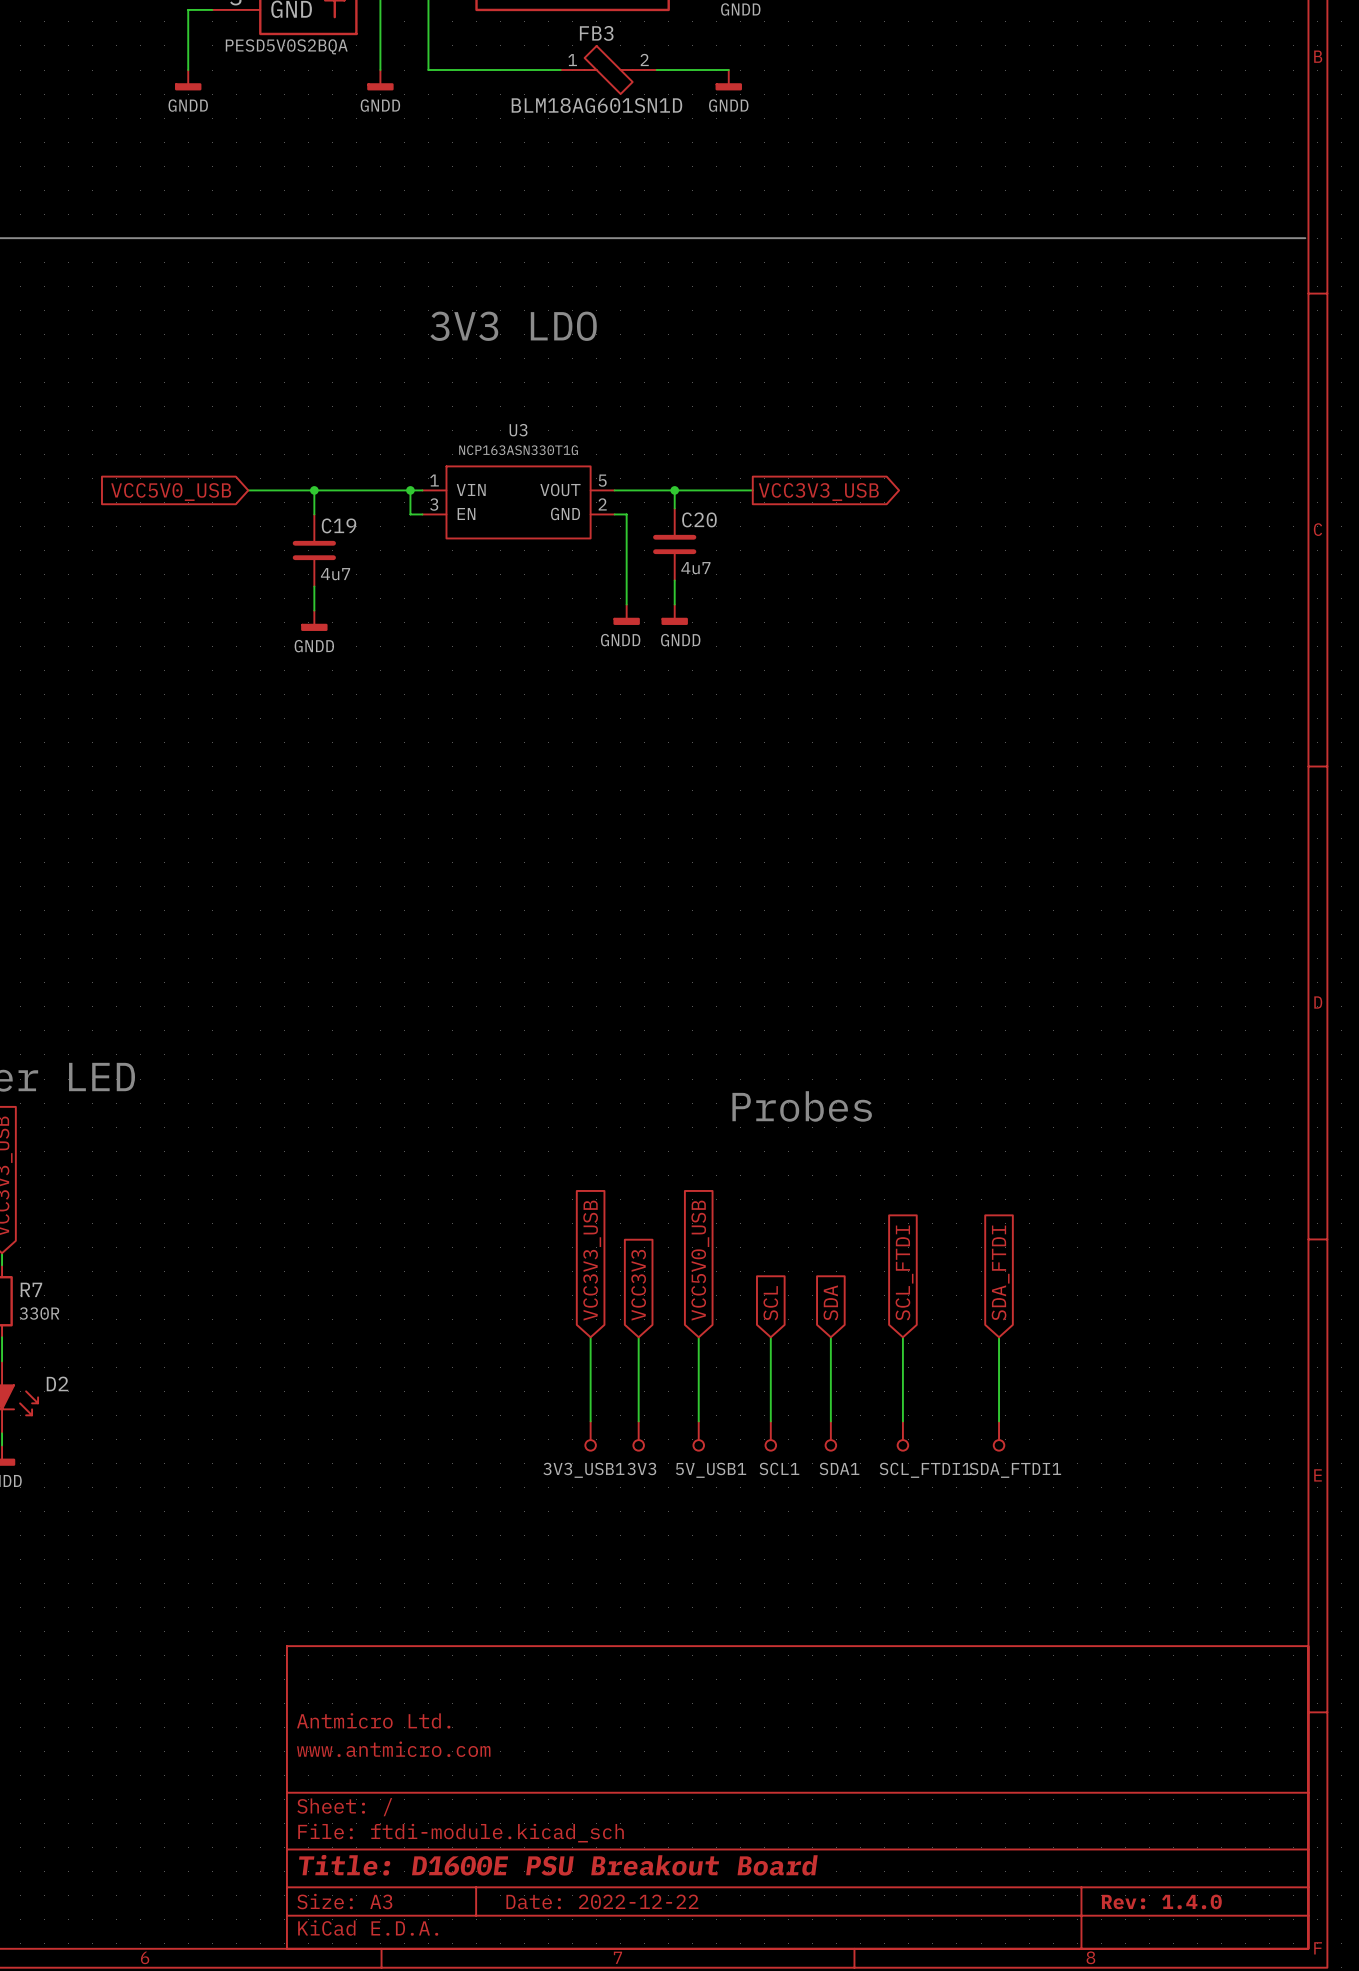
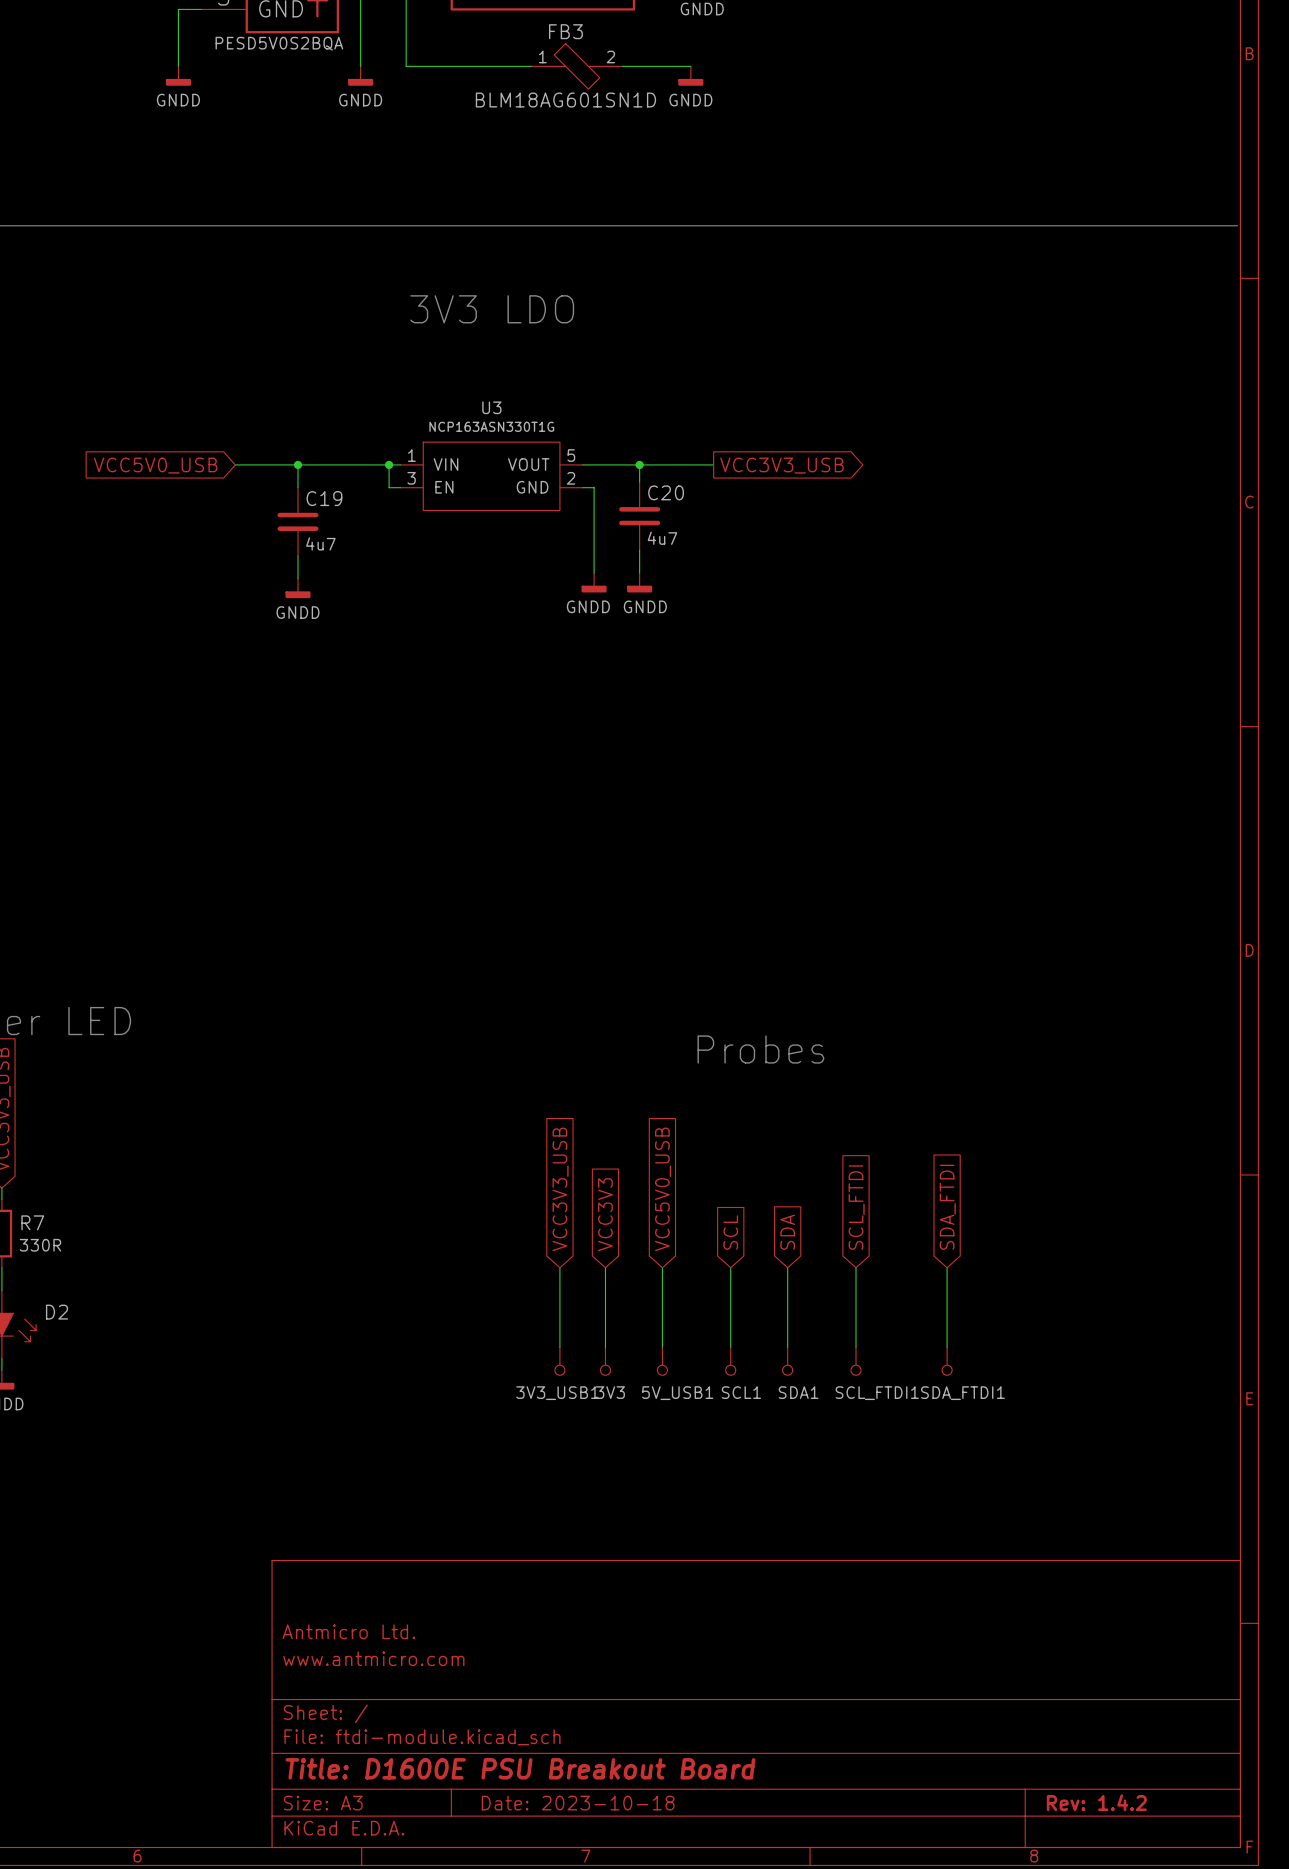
title block: Date: 2022-12-22 (602, 1901) -> Date: 2023-10-18 (578, 1803)
title block: Rev: 1.4.0 (1161, 1901) -> Rev: 1.4.2 (1096, 1802)

